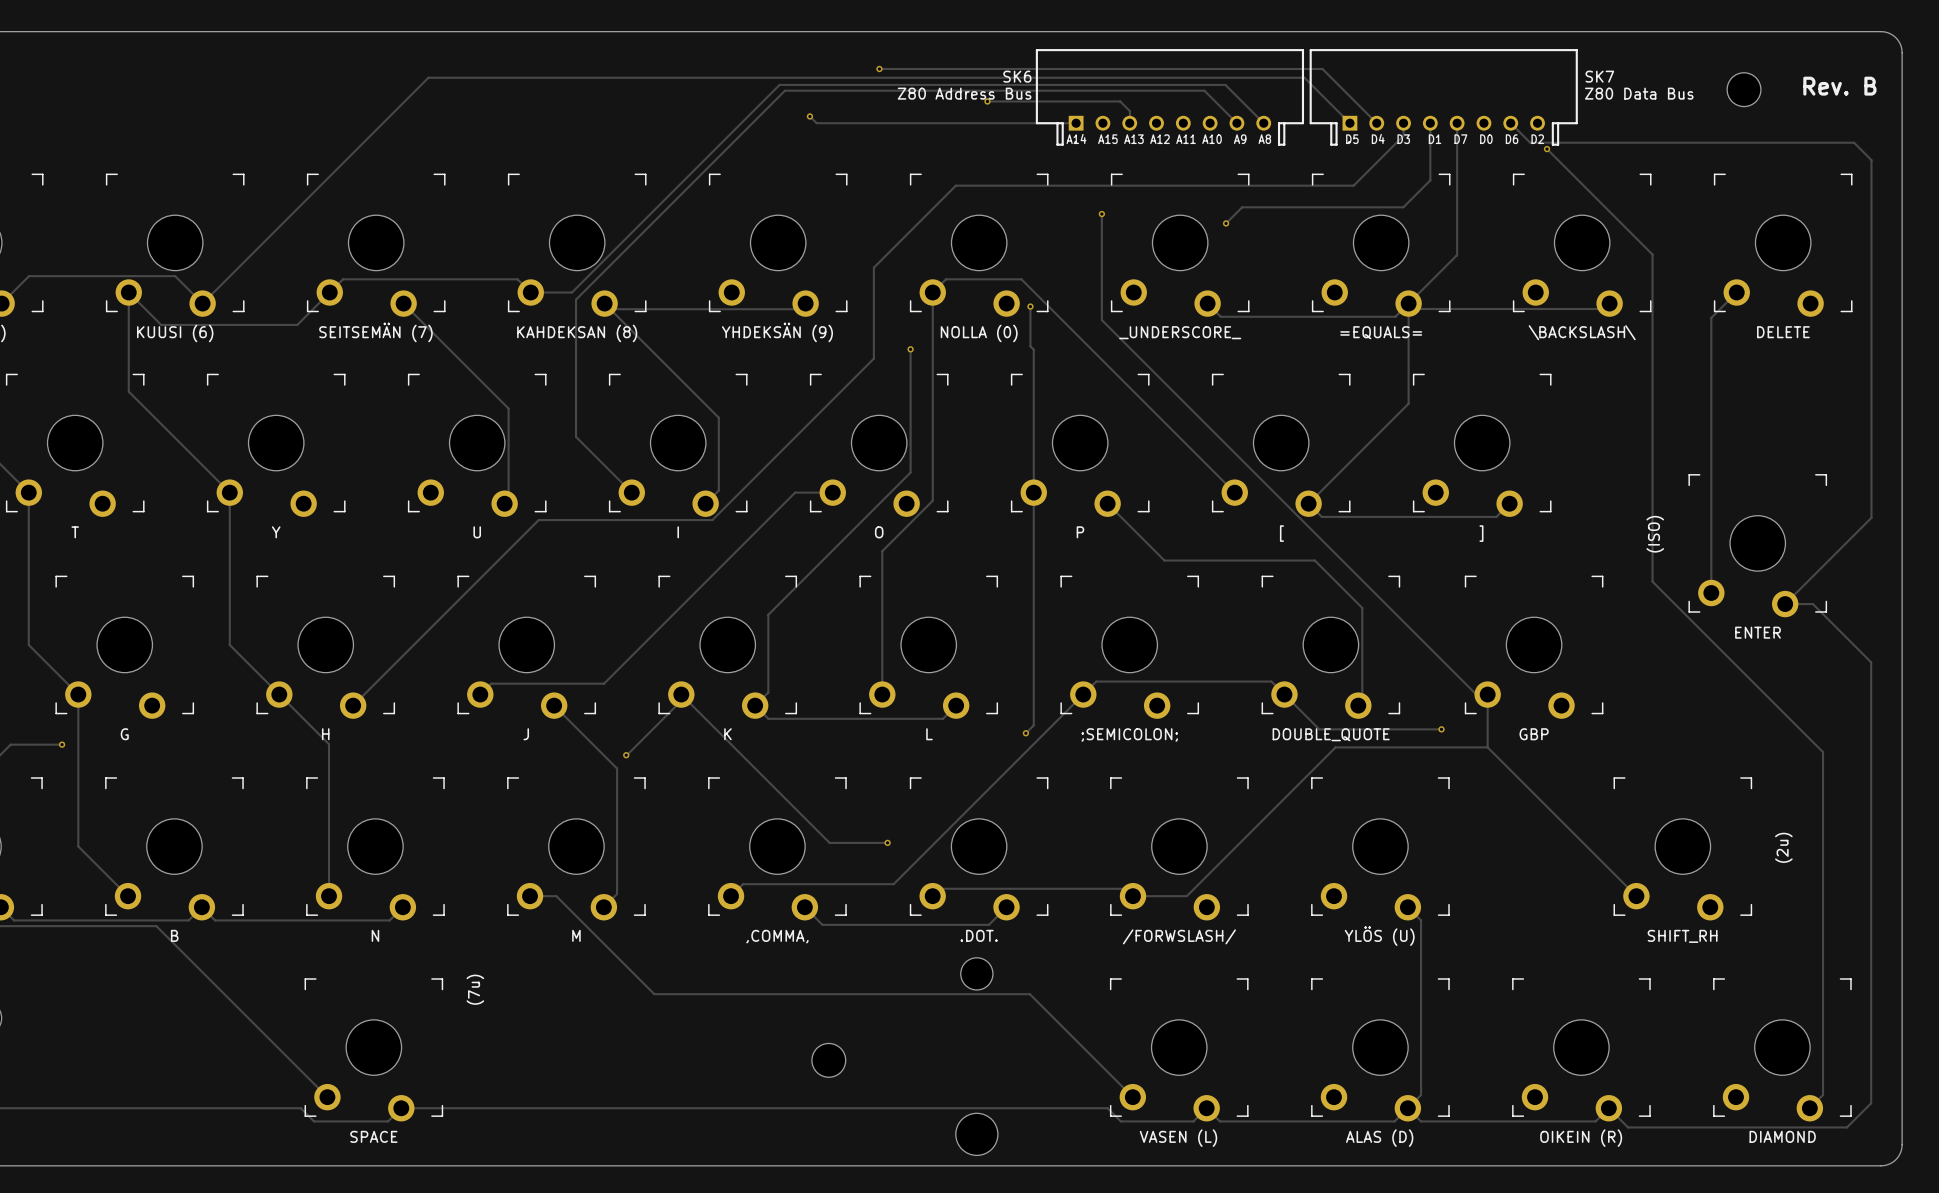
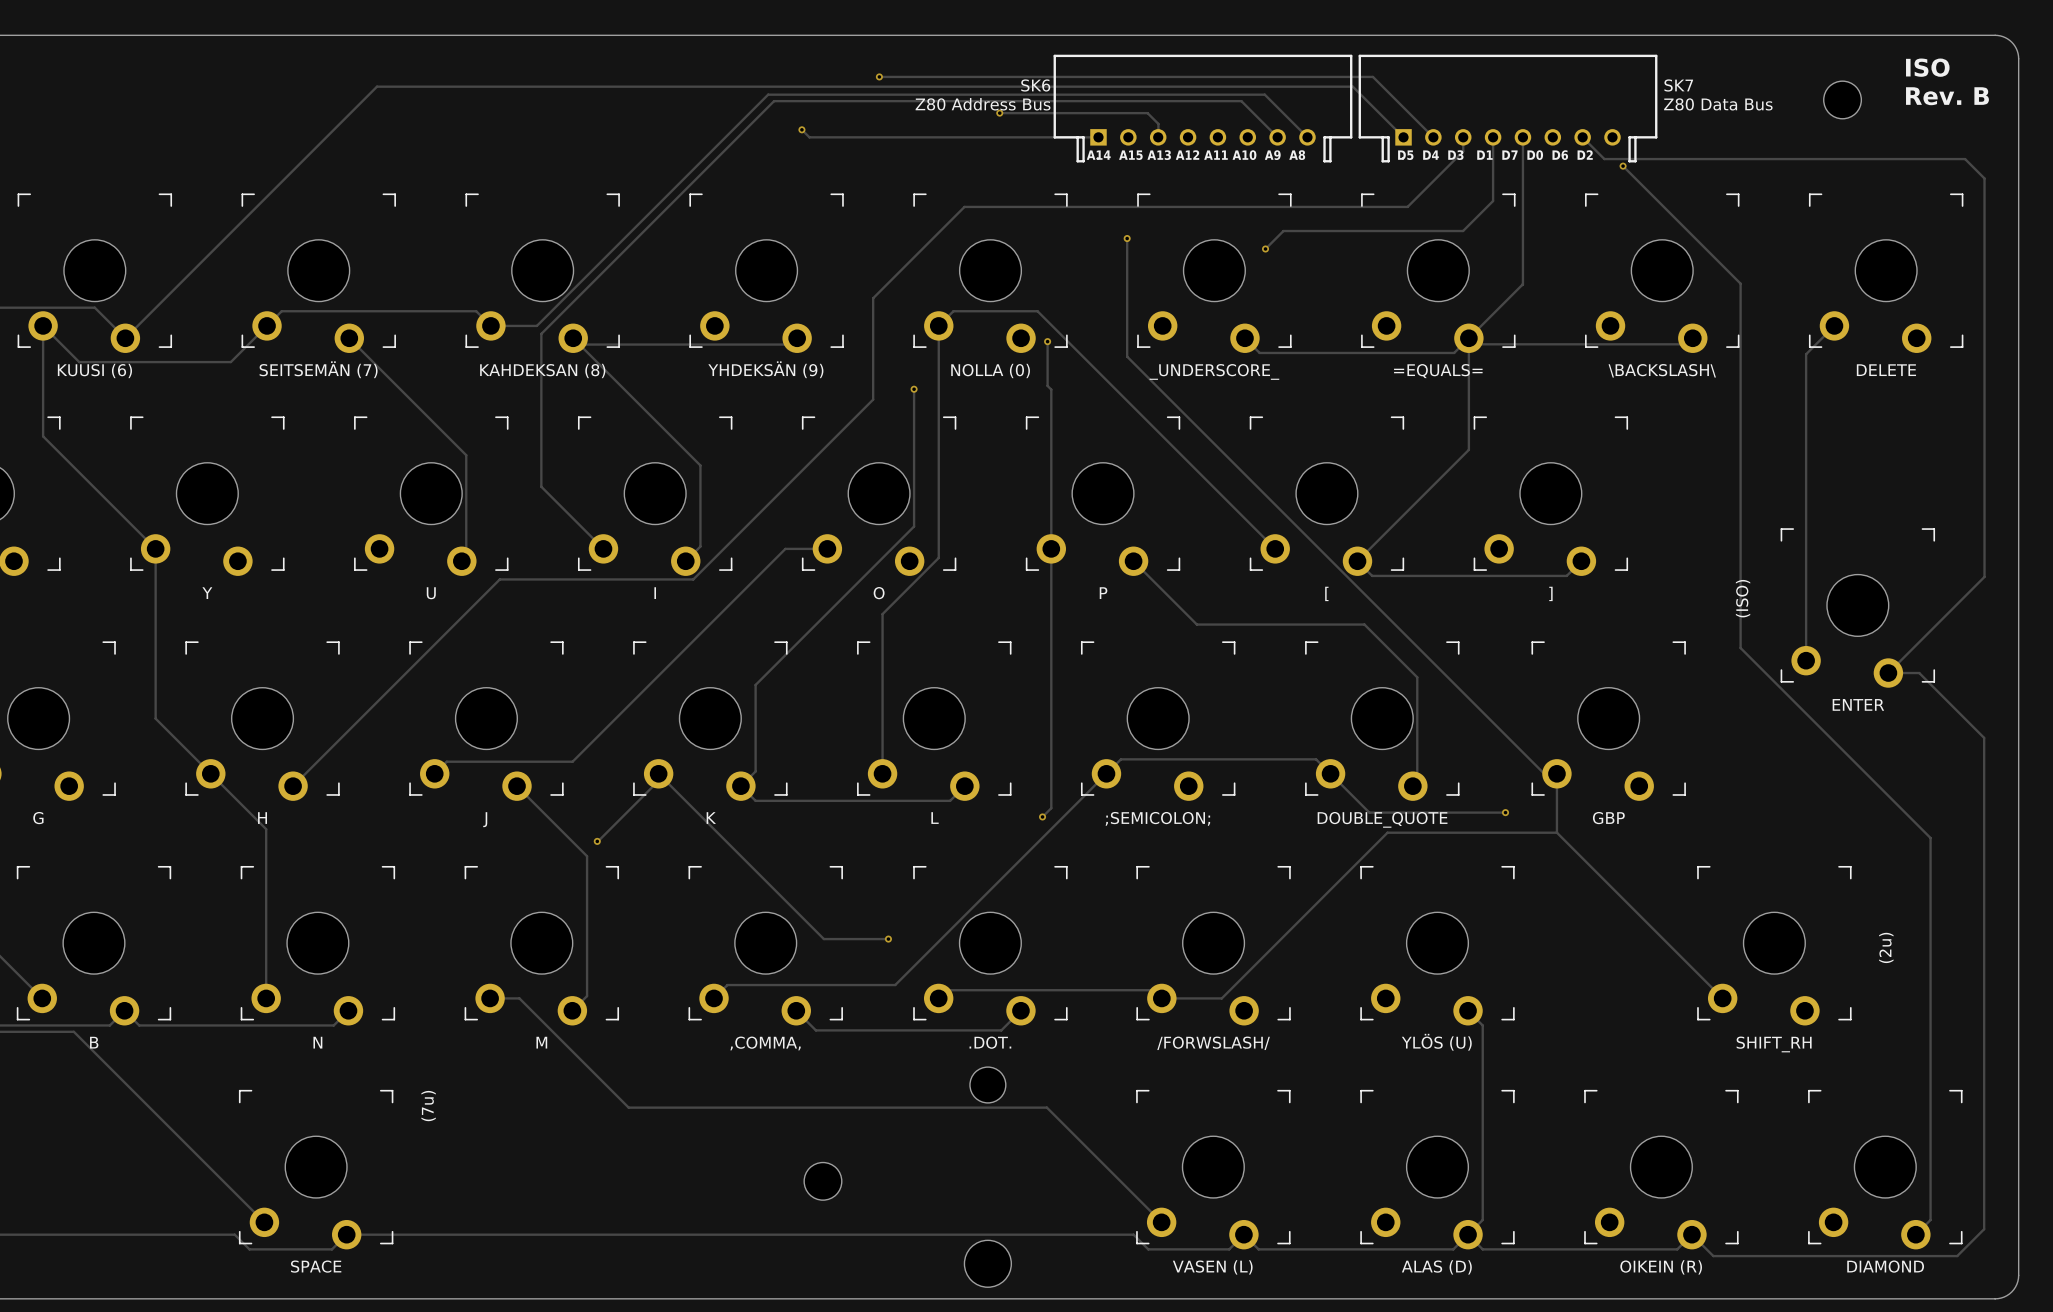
text: none -> ISO (1927, 67)

